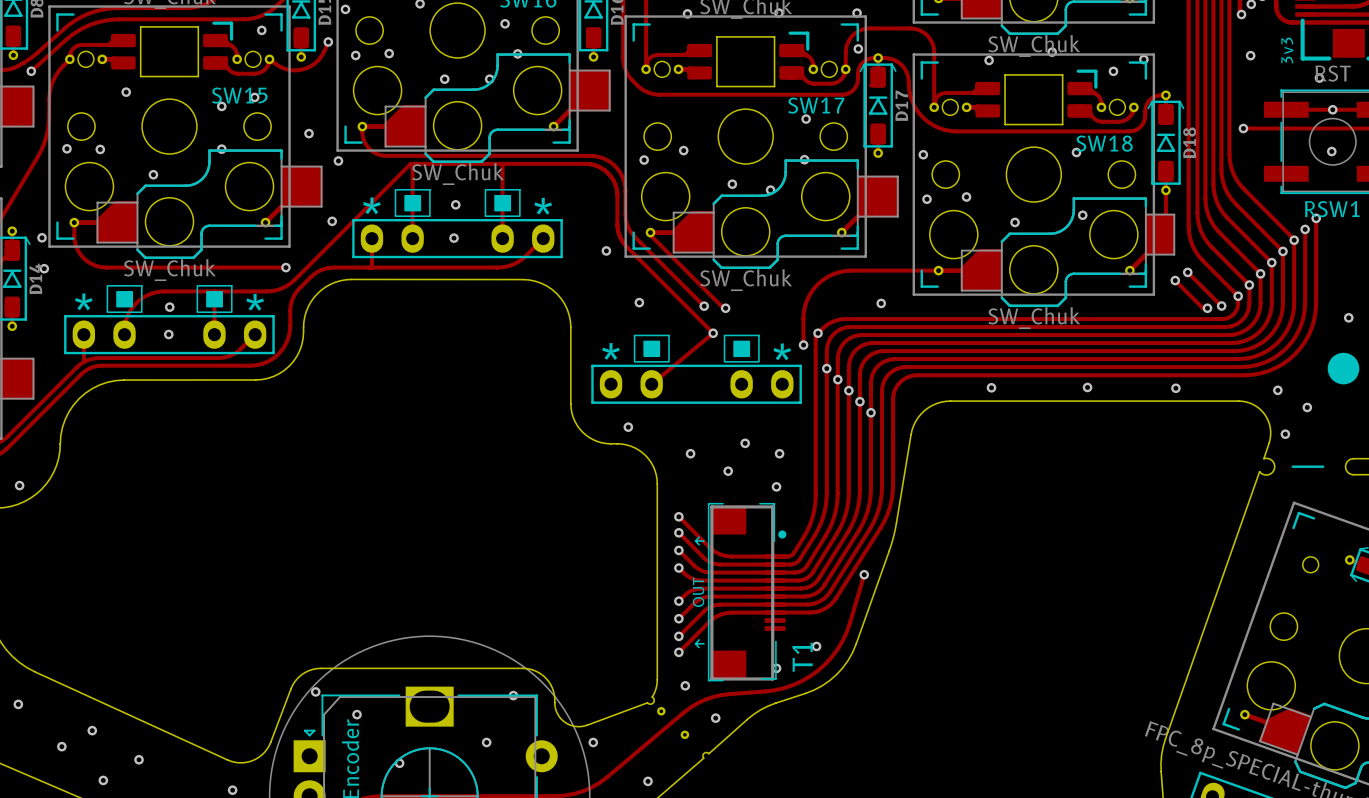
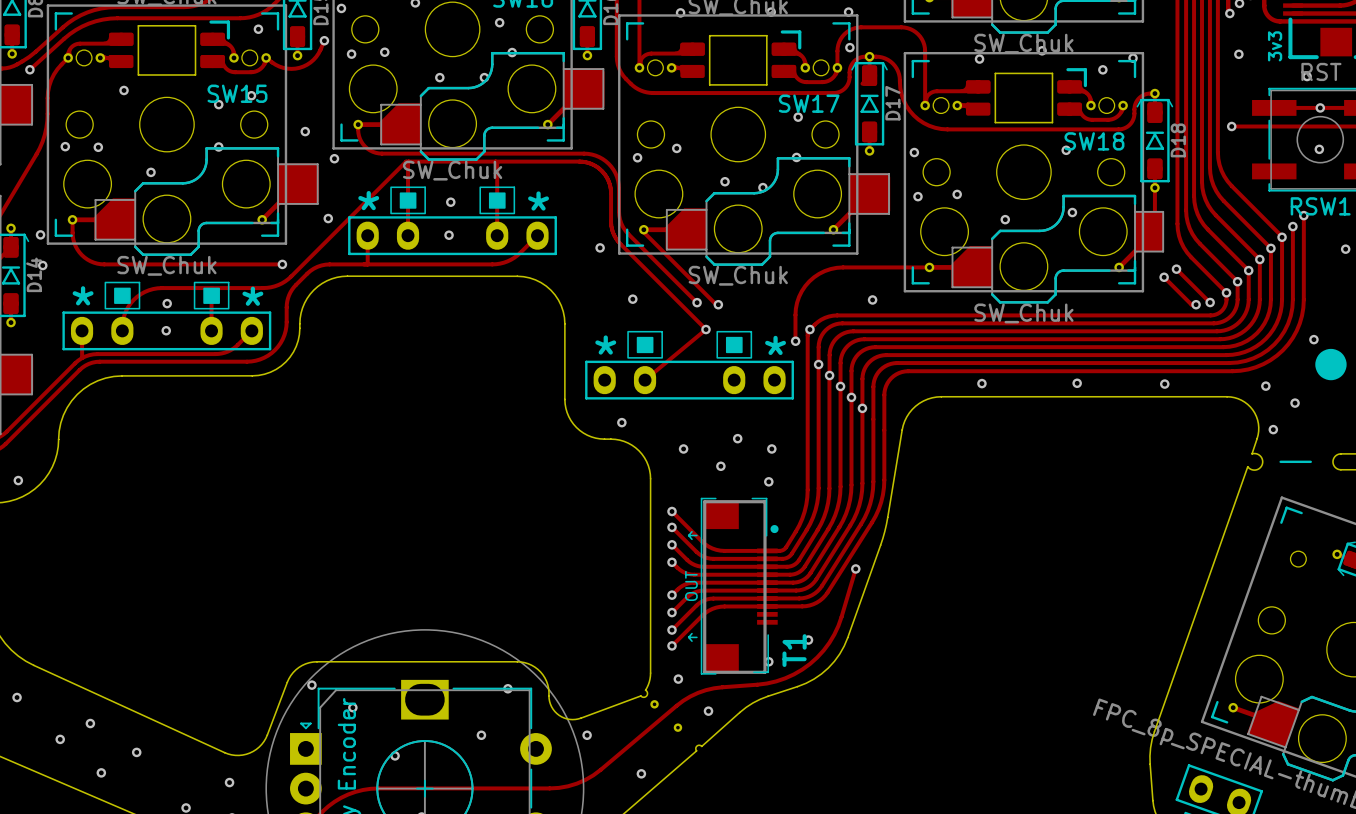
via: none -> (1345, 249)
via: (1348, 317) -> none
via: none -> (1313, 339)

